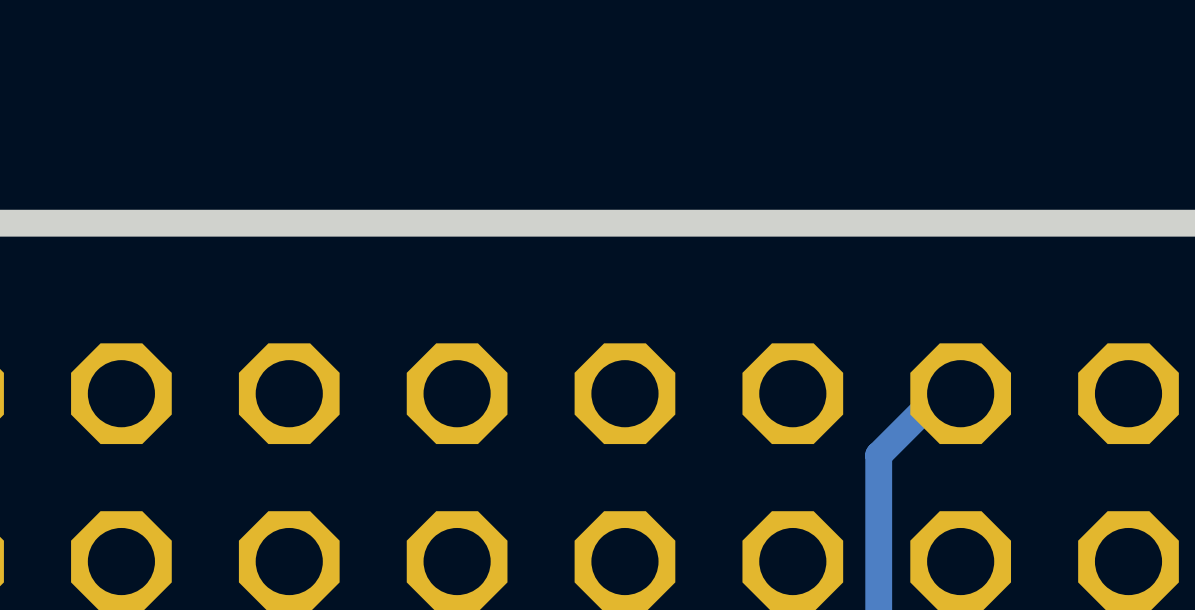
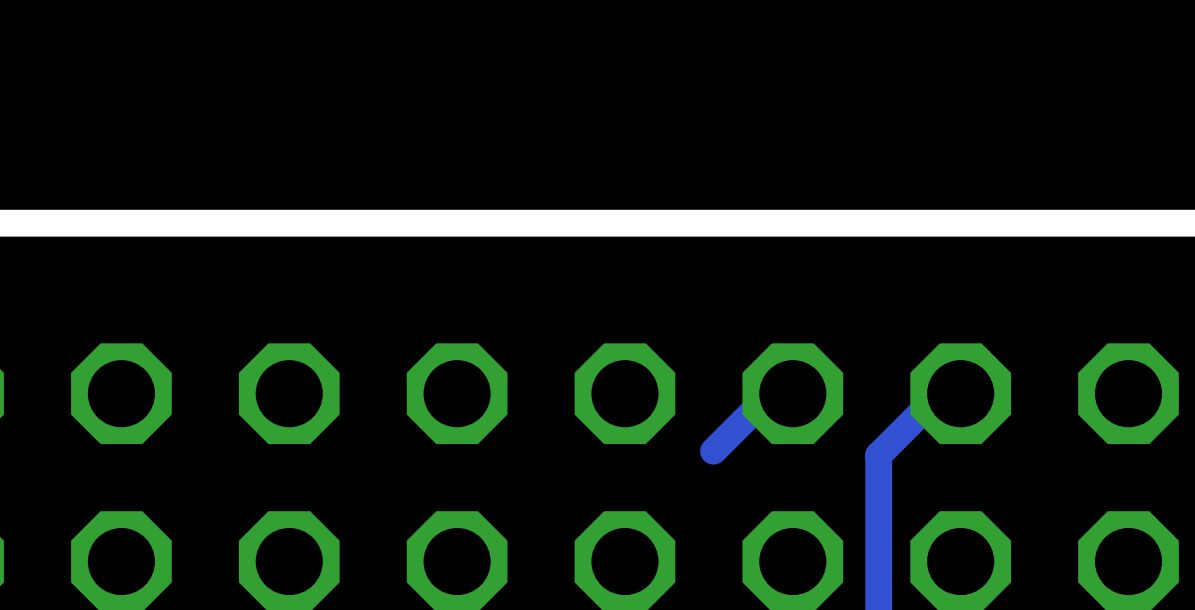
bottom track: none -> (792, 393) (771, 393) (713, 451)

